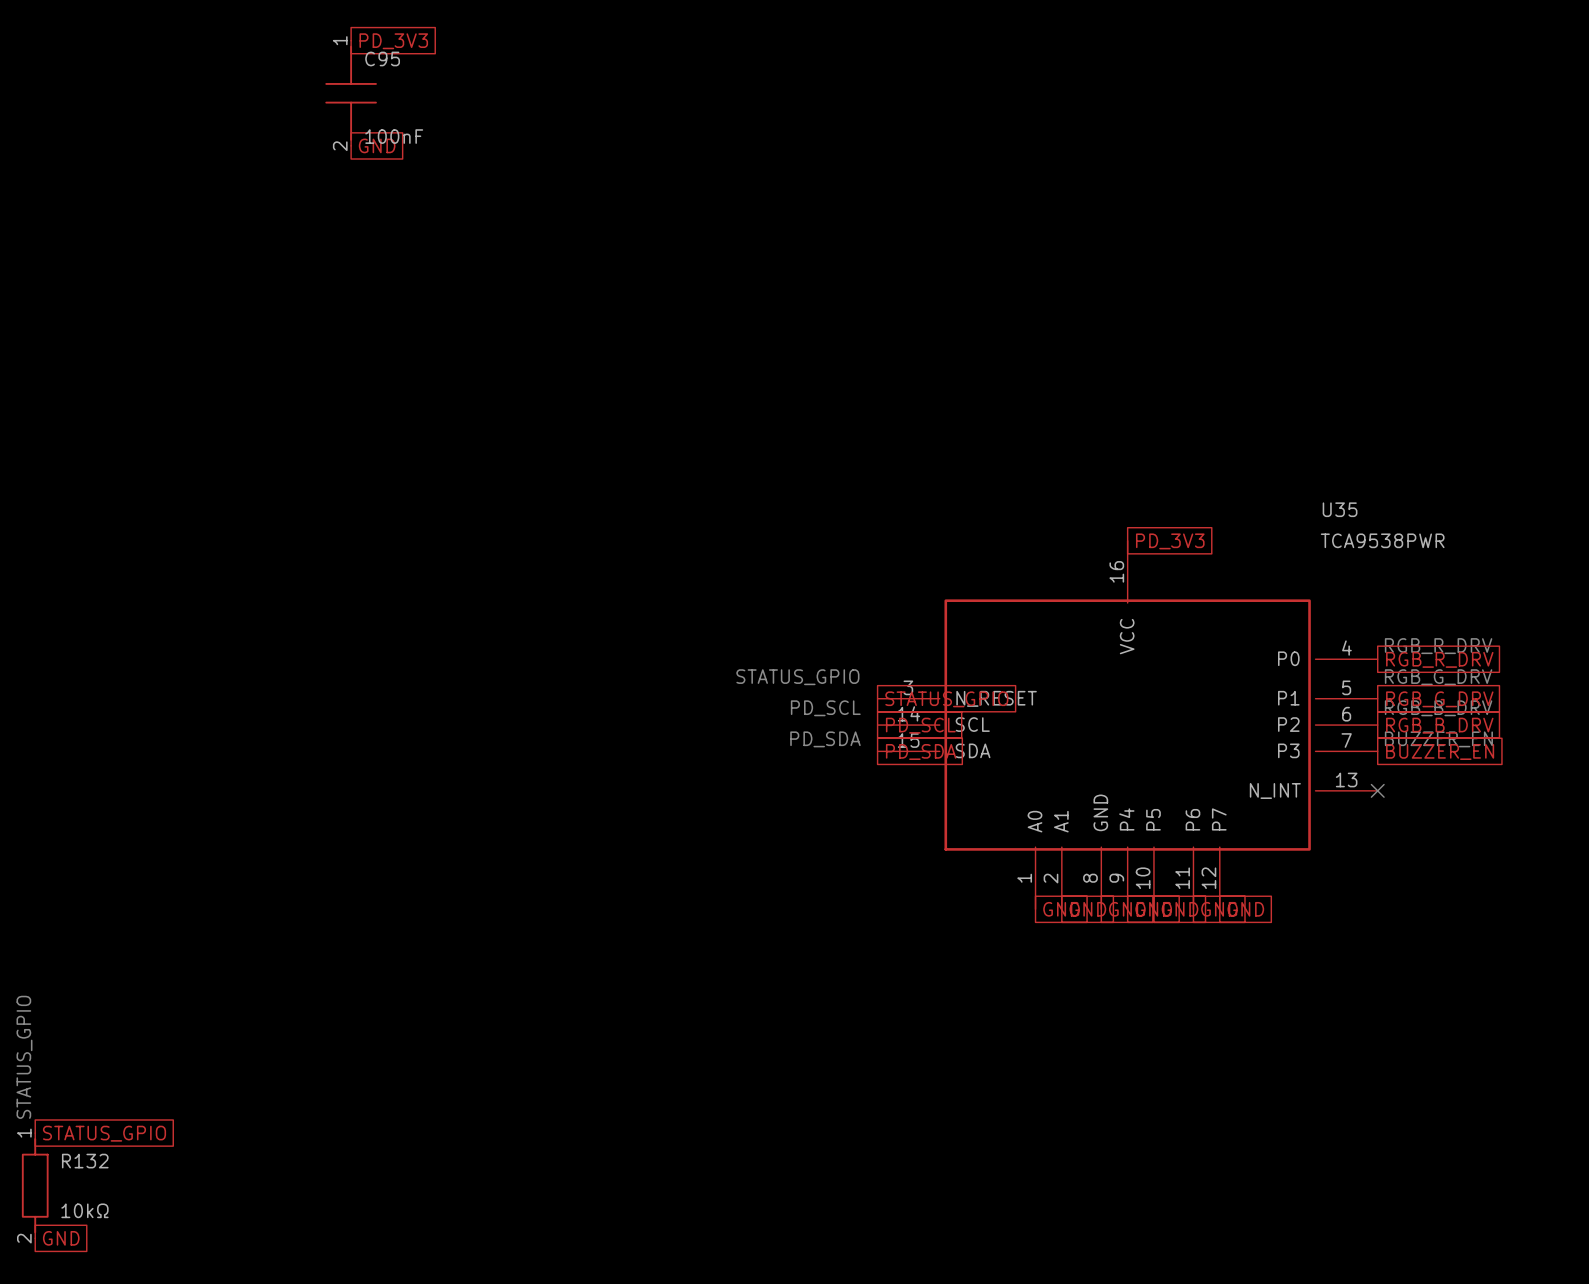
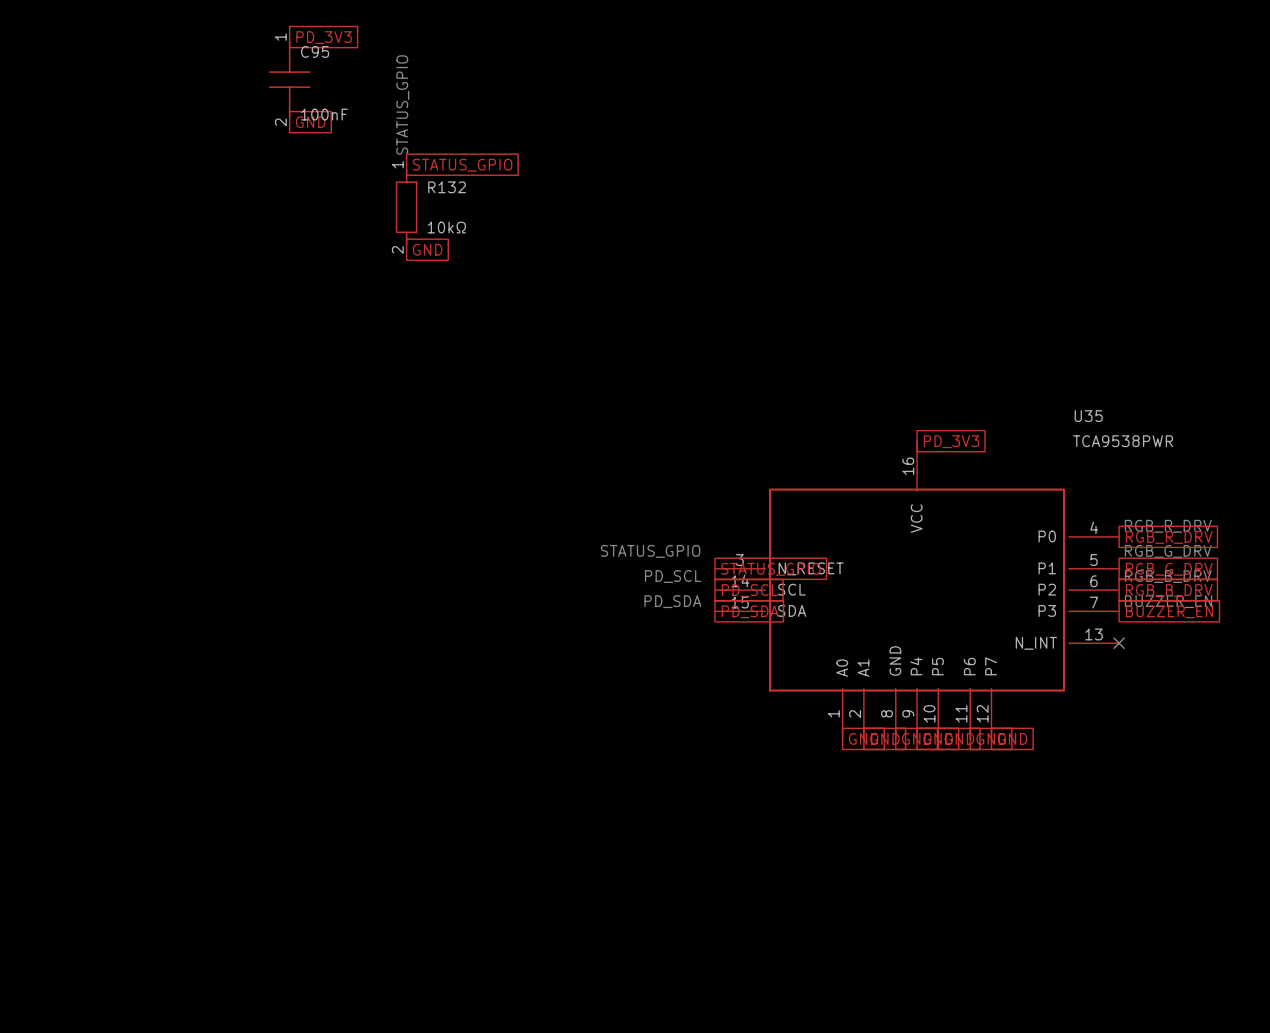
text: none -> STATUS_GPIO (402, 105)
global label: none -> STATUS_GPIO (462, 165)
global label: none -> GND (427, 249)
text: STATUS_GPIO (24, 1057) -> none
global label: STATUS_GPIO (104, 1133) -> none
R132 position: (35, 1185) -> (406, 207)
global label: GND (61, 1238) -> none

